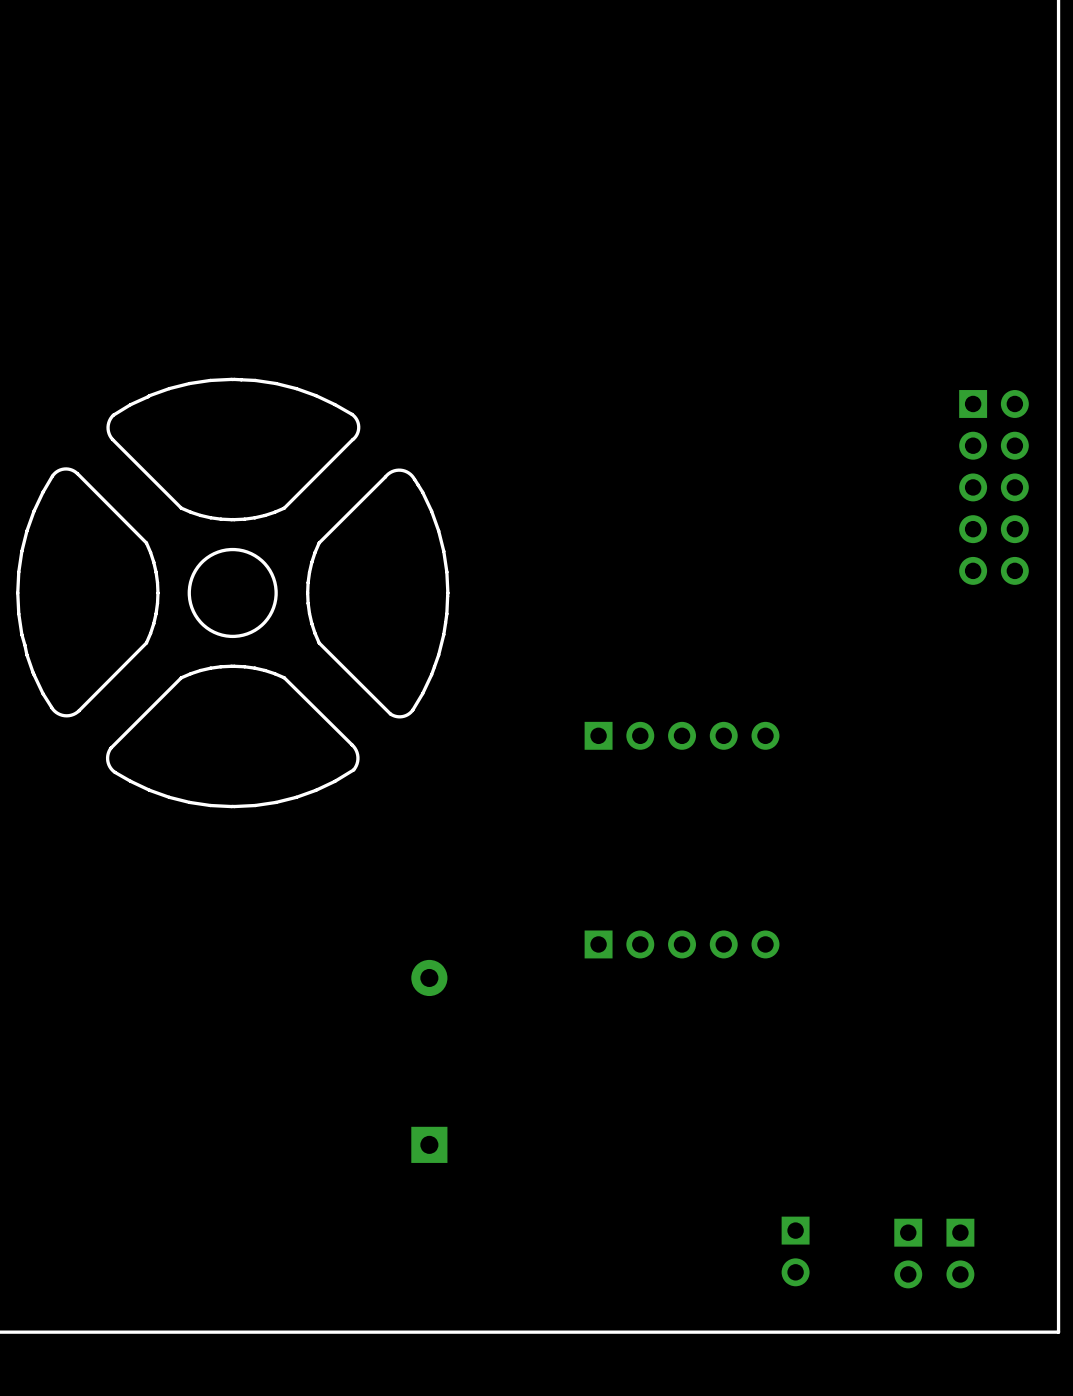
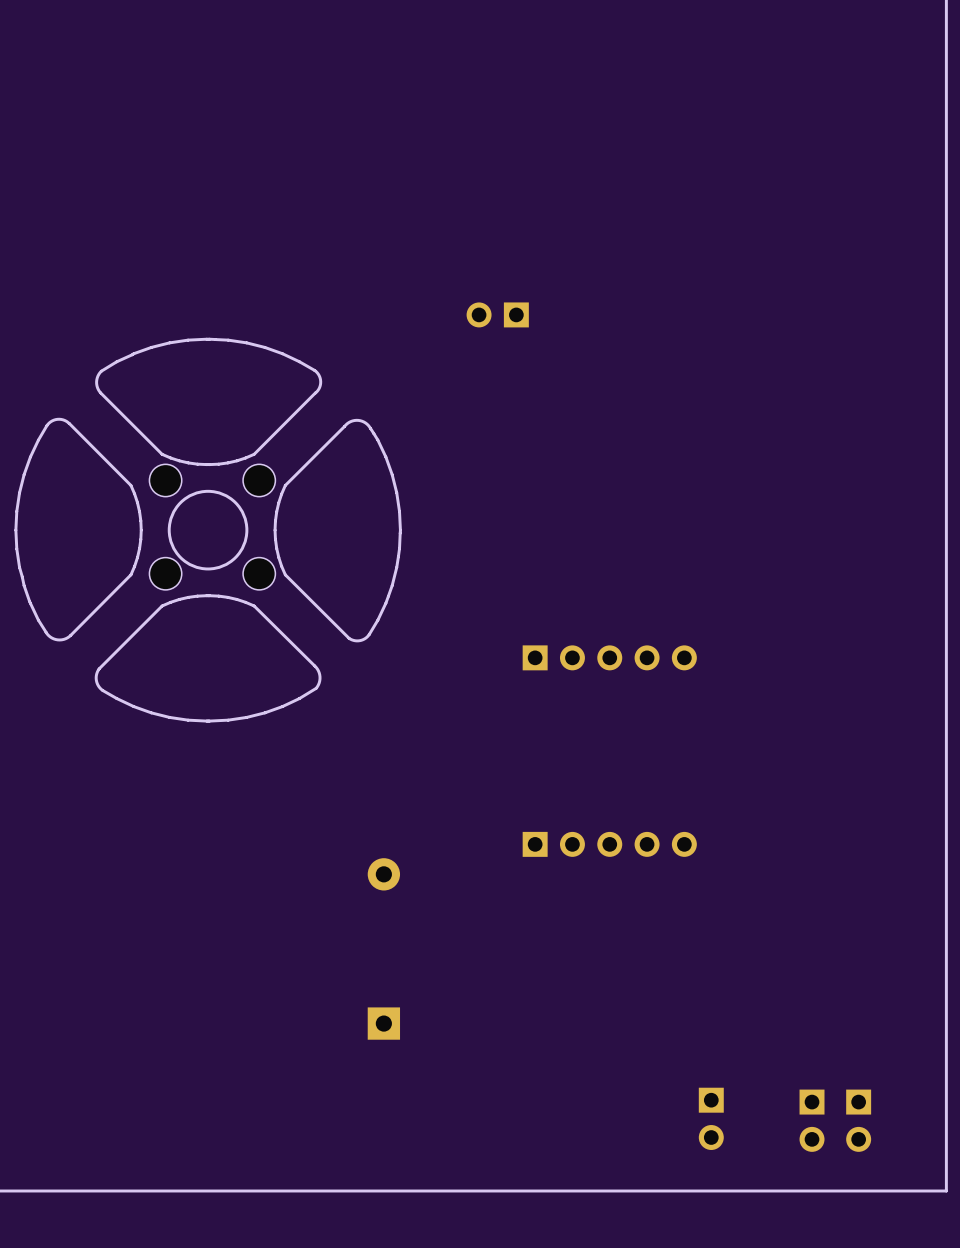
part: none -> (497, 314)
part: (993, 487) -> none
part: none -> (165, 480)
part: none -> (259, 480)
part: none -> (165, 573)
part: none -> (259, 573)

